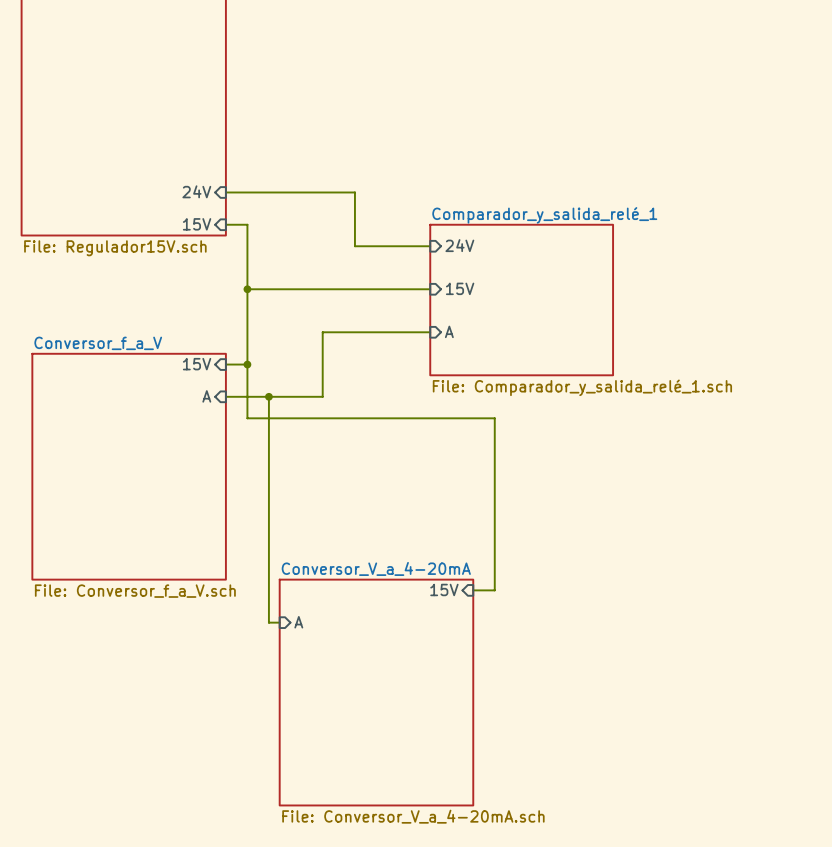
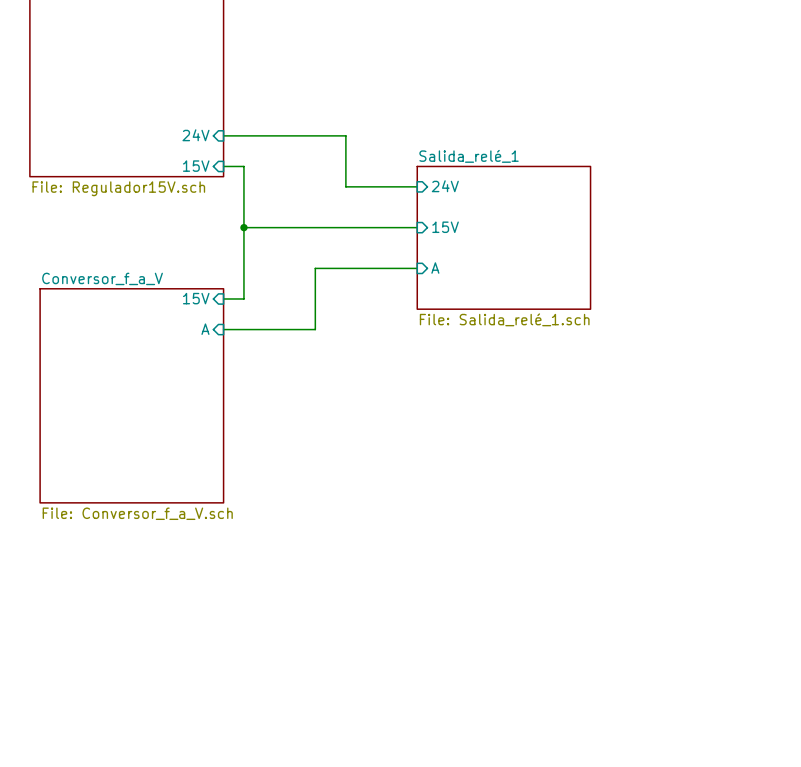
sheet Comparador_y_salida_relé_1 name: Comparador_y_salida_relé_1 (544, 215) -> Salida_relé_1 (469, 156)
wire: (247, 364) (247, 418) (494, 418) (494, 590) (473, 590) -> none
junction: (247, 364) -> none
sheet Comparador_y_salida_relé_1 value: File: Comparador_y_salida_relé_1.sch (582, 387) -> File: Salida_relé_1.sch (504, 319)
wire: (268, 396) (268, 622) (279, 622) -> none
junction: (268, 396) -> none
sheet pin: 15V (444, 589) -> none
sheet pin: A (298, 622) -> none
sheet Conversor_V_a_4-20mA: File: Conversor_V_a_4-20mA.sch (376, 692) -> none

